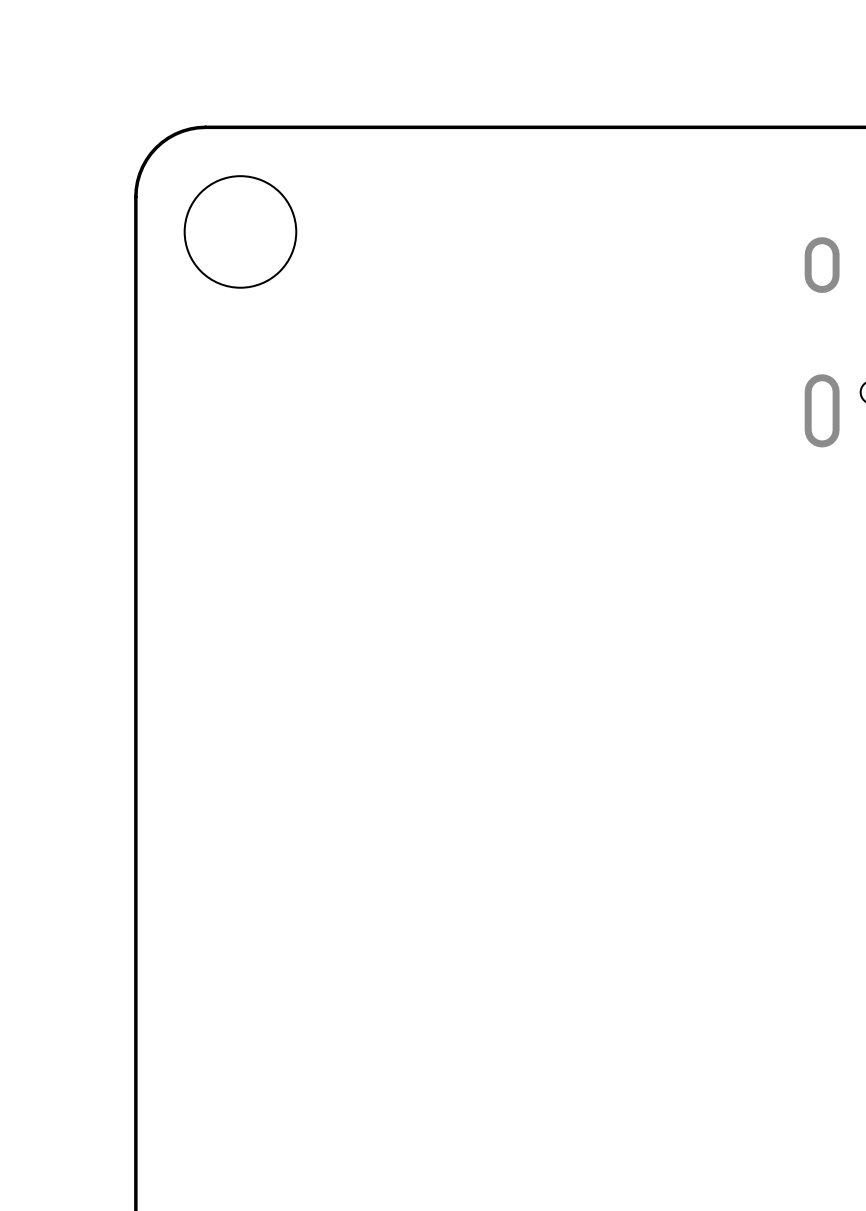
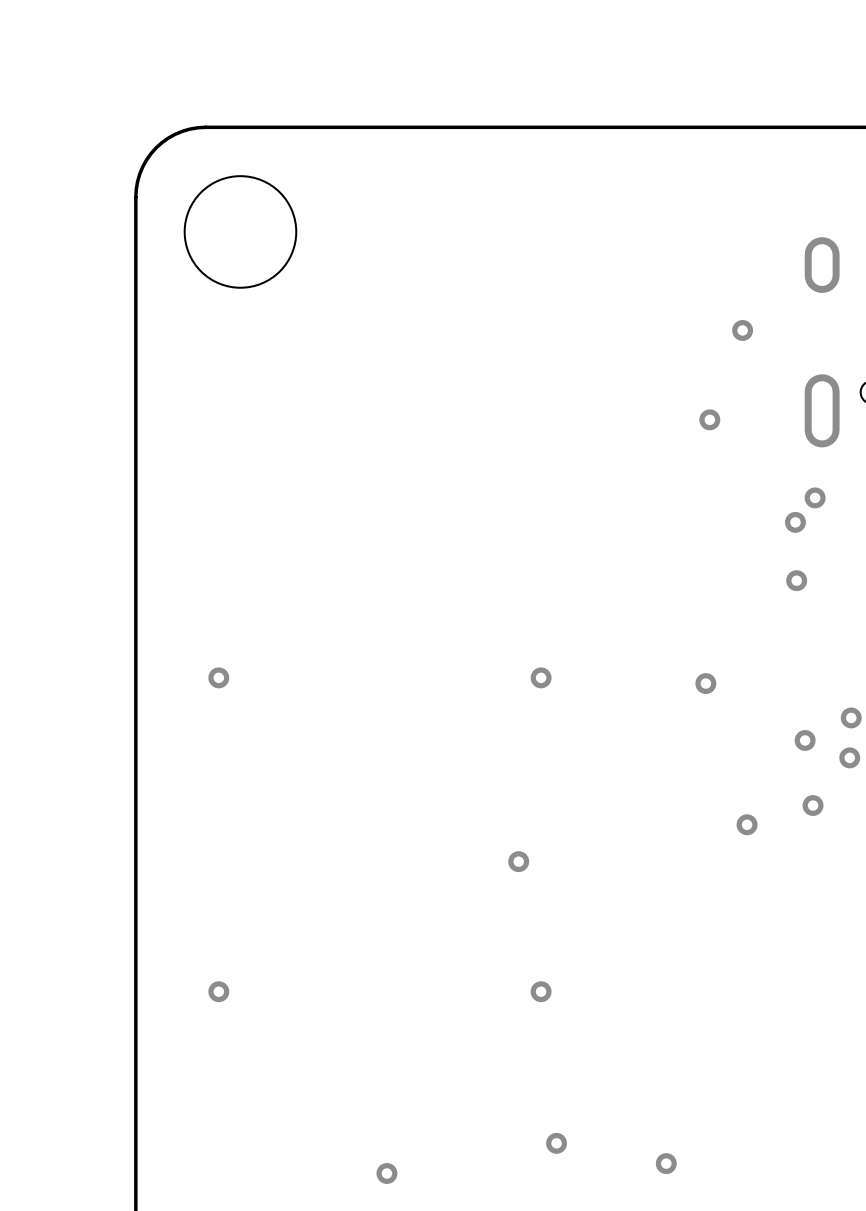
via: none -> (742, 330)
via: none -> (709, 419)
via: none -> (815, 497)
via: none -> (795, 522)
via: none -> (796, 580)
via: none -> (218, 677)
via: none -> (541, 677)
via: none -> (705, 683)
via: none -> (851, 717)
via: none -> (805, 740)
via: none -> (849, 757)
via: none -> (813, 805)
via: none -> (747, 824)
via: none -> (518, 861)
via: none -> (218, 991)
via: none -> (541, 991)
via: none -> (556, 1143)
via: none -> (666, 1163)
via: none -> (386, 1173)

